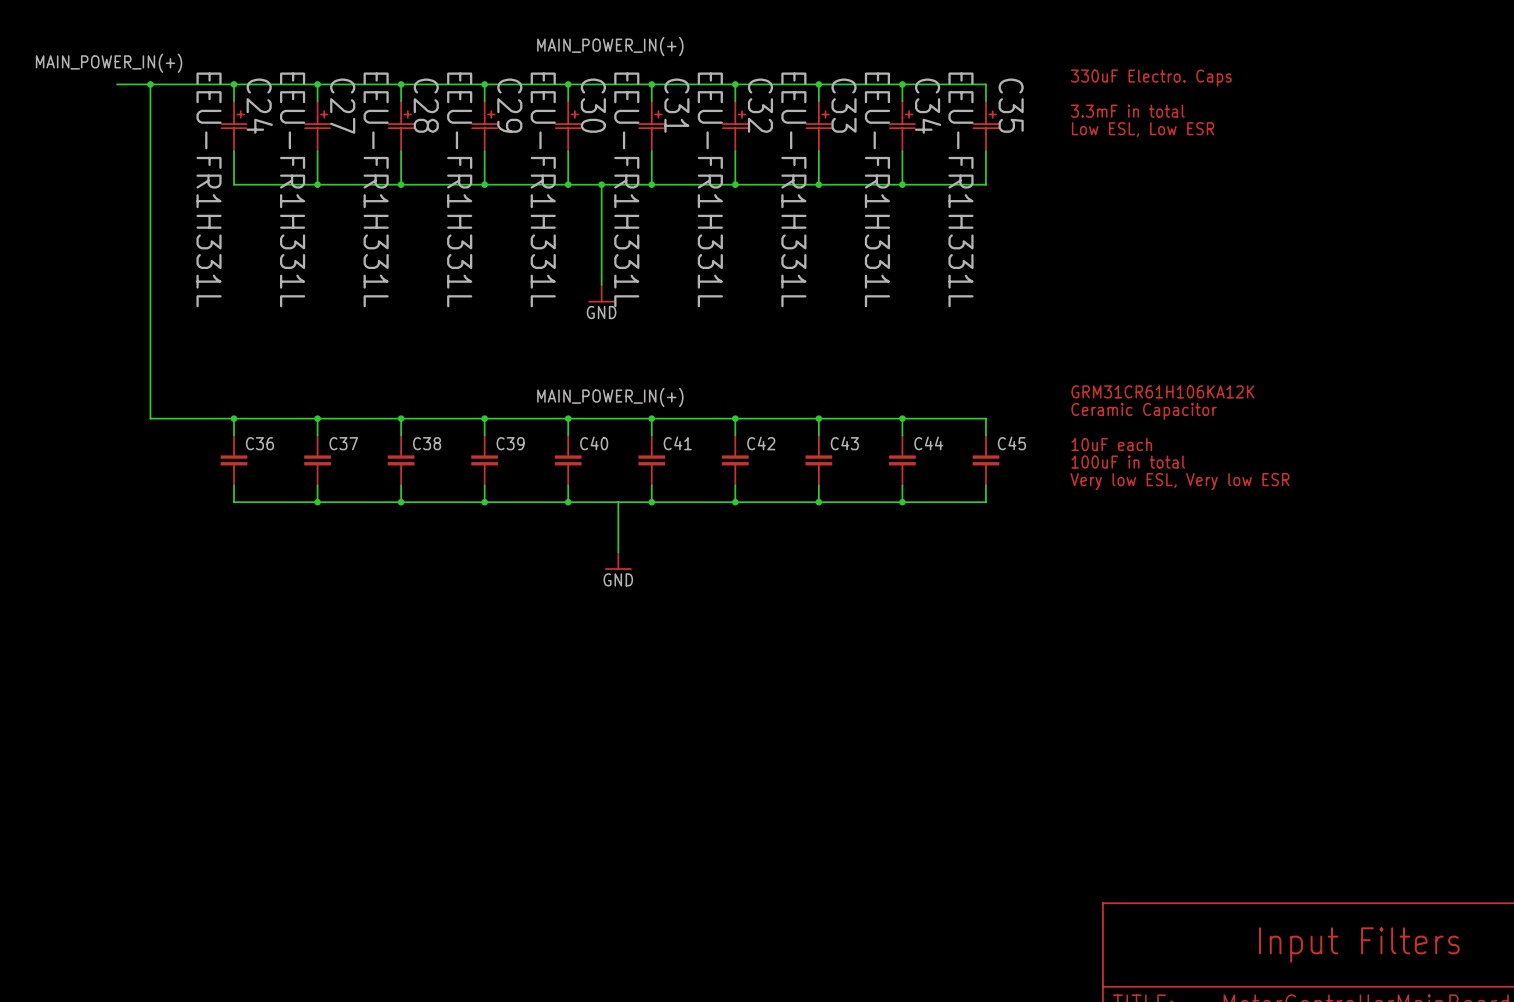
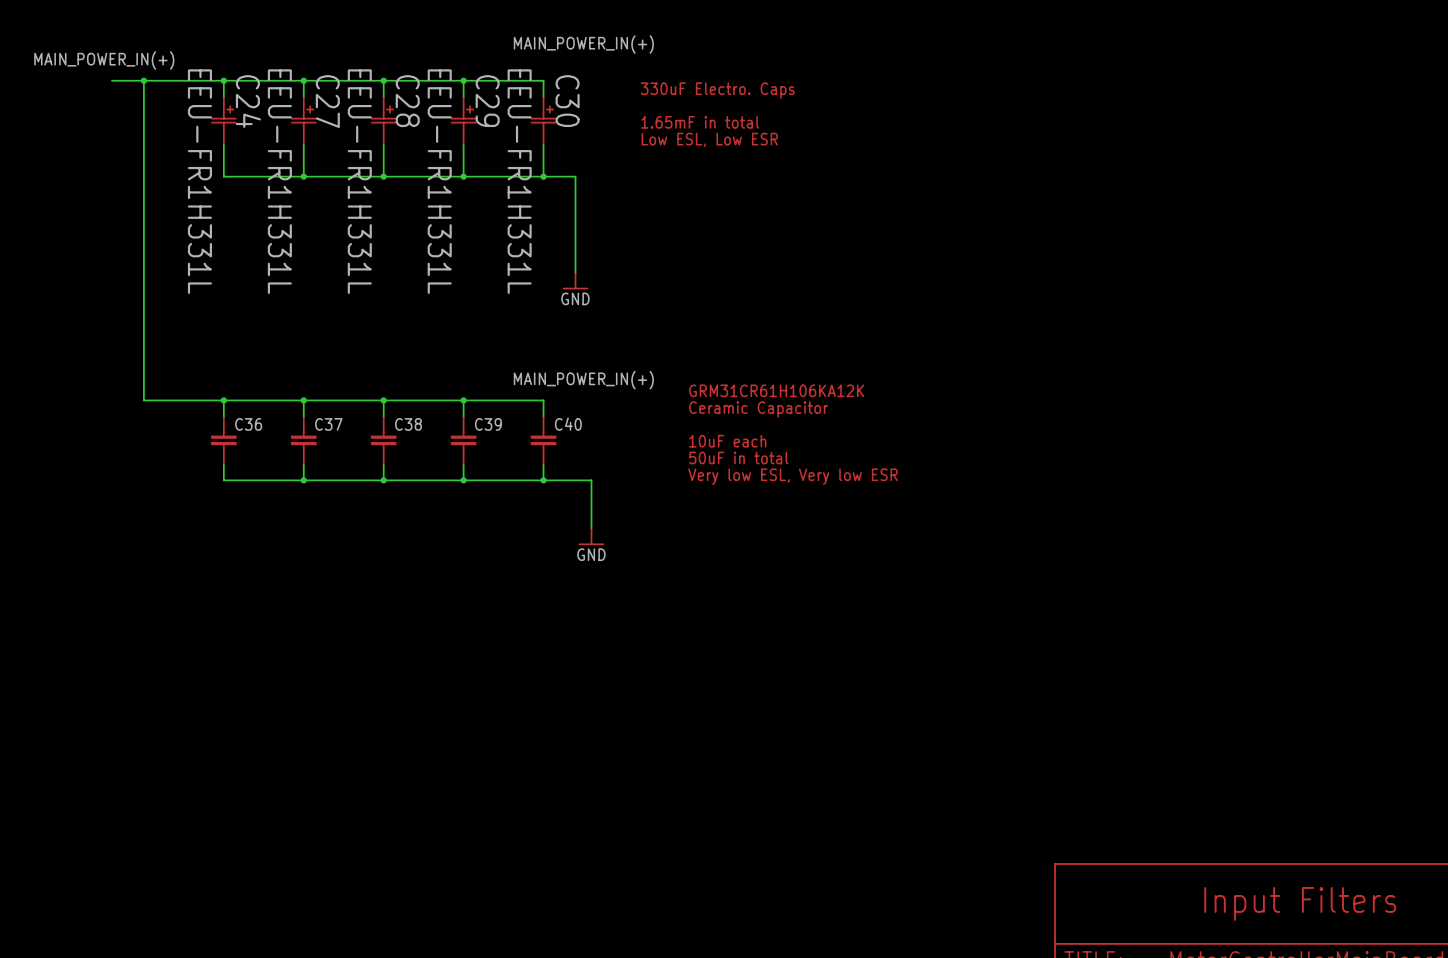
text: 330uF Electro. Caps (1151, 78) -> none
wire: (568, 84) (985, 84) (985, 101) -> none
junction: (568, 84) -> none
wire: (651, 84) (651, 101) -> none
junction: (651, 84) -> none
wire: (735, 84) (735, 101) -> none
junction: (735, 84) -> none
wire: (818, 84) (818, 101) -> none
junction: (818, 84) -> none
wire: (902, 84) (902, 101) -> none
junction: (902, 84) -> none
text: none -> 330uF Electro. Caps (717, 90)
text: 3.3mF in total (1127, 111) -> none
C31: EEU-FR1H331L (651, 126) -> none
C32: EEU-FR1H331L (735, 126) -> none
C33: EEU-FR1H331L (818, 126) -> none
C34: EEU-FR1H331L (902, 126) -> none
C35: EEU-FR1H331L (985, 126) -> none
text: none -> 1.65mF in total (700, 122)
text: Low ESL, Low ESR (1143, 129) -> none
text: none -> Low ESL, Low ESR (709, 139)
wire: (651, 151) (651, 184) -> none
wire: (735, 151) (735, 184) -> none
wire: (818, 151) (818, 184) -> none
wire: (902, 151) (902, 184) -> none
wire: (985, 151) (985, 184) (601, 184) -> none
junction: (601, 184) -> none
junction: (651, 184) -> none
junction: (735, 184) -> none
junction: (818, 184) -> none
junction: (902, 184) -> none
text: GRM31CR61H106KA12K (1162, 391) -> none
text: none -> GRM31CR61H106KA12K (776, 390)
text: Ceramic Capacitor (1144, 411) -> none
wire: (568, 418) (985, 418) (985, 435) -> none
junction: (568, 418) -> none
wire: (651, 418) (651, 435) -> none
junction: (651, 418) -> none
wire: (735, 418) (735, 435) -> none
junction: (735, 418) -> none
wire: (818, 418) (818, 435) -> none
junction: (818, 418) -> none
wire: (902, 418) (902, 435) -> none
junction: (902, 418) -> none
text: none -> Ceramic Capacitor (758, 409)
text: 10uF each (1111, 444) -> none
C41: (651, 460) -> none
C42: (735, 460) -> none
C43: (818, 460) -> none
C44: (902, 460) -> none
C45: (985, 460) -> none
text: none -> 10uF each (727, 441)
text: 100uF in total (1128, 462) -> none
text: none -> 50uF in total (738, 457)
text: Very low ESL, Very low ESR (1179, 481) -> none
wire: (651, 485) (651, 502) -> none
wire: (735, 485) (735, 502) -> none
wire: (818, 485) (818, 502) -> none
wire: (902, 485) (902, 502) -> none
wire: (985, 485) (985, 502) (618, 502) -> none
text: none -> Very low ESL, Very low ESR (793, 476)
junction: (651, 502) -> none
junction: (735, 502) -> none
junction: (818, 502) -> none
junction: (902, 502) -> none

